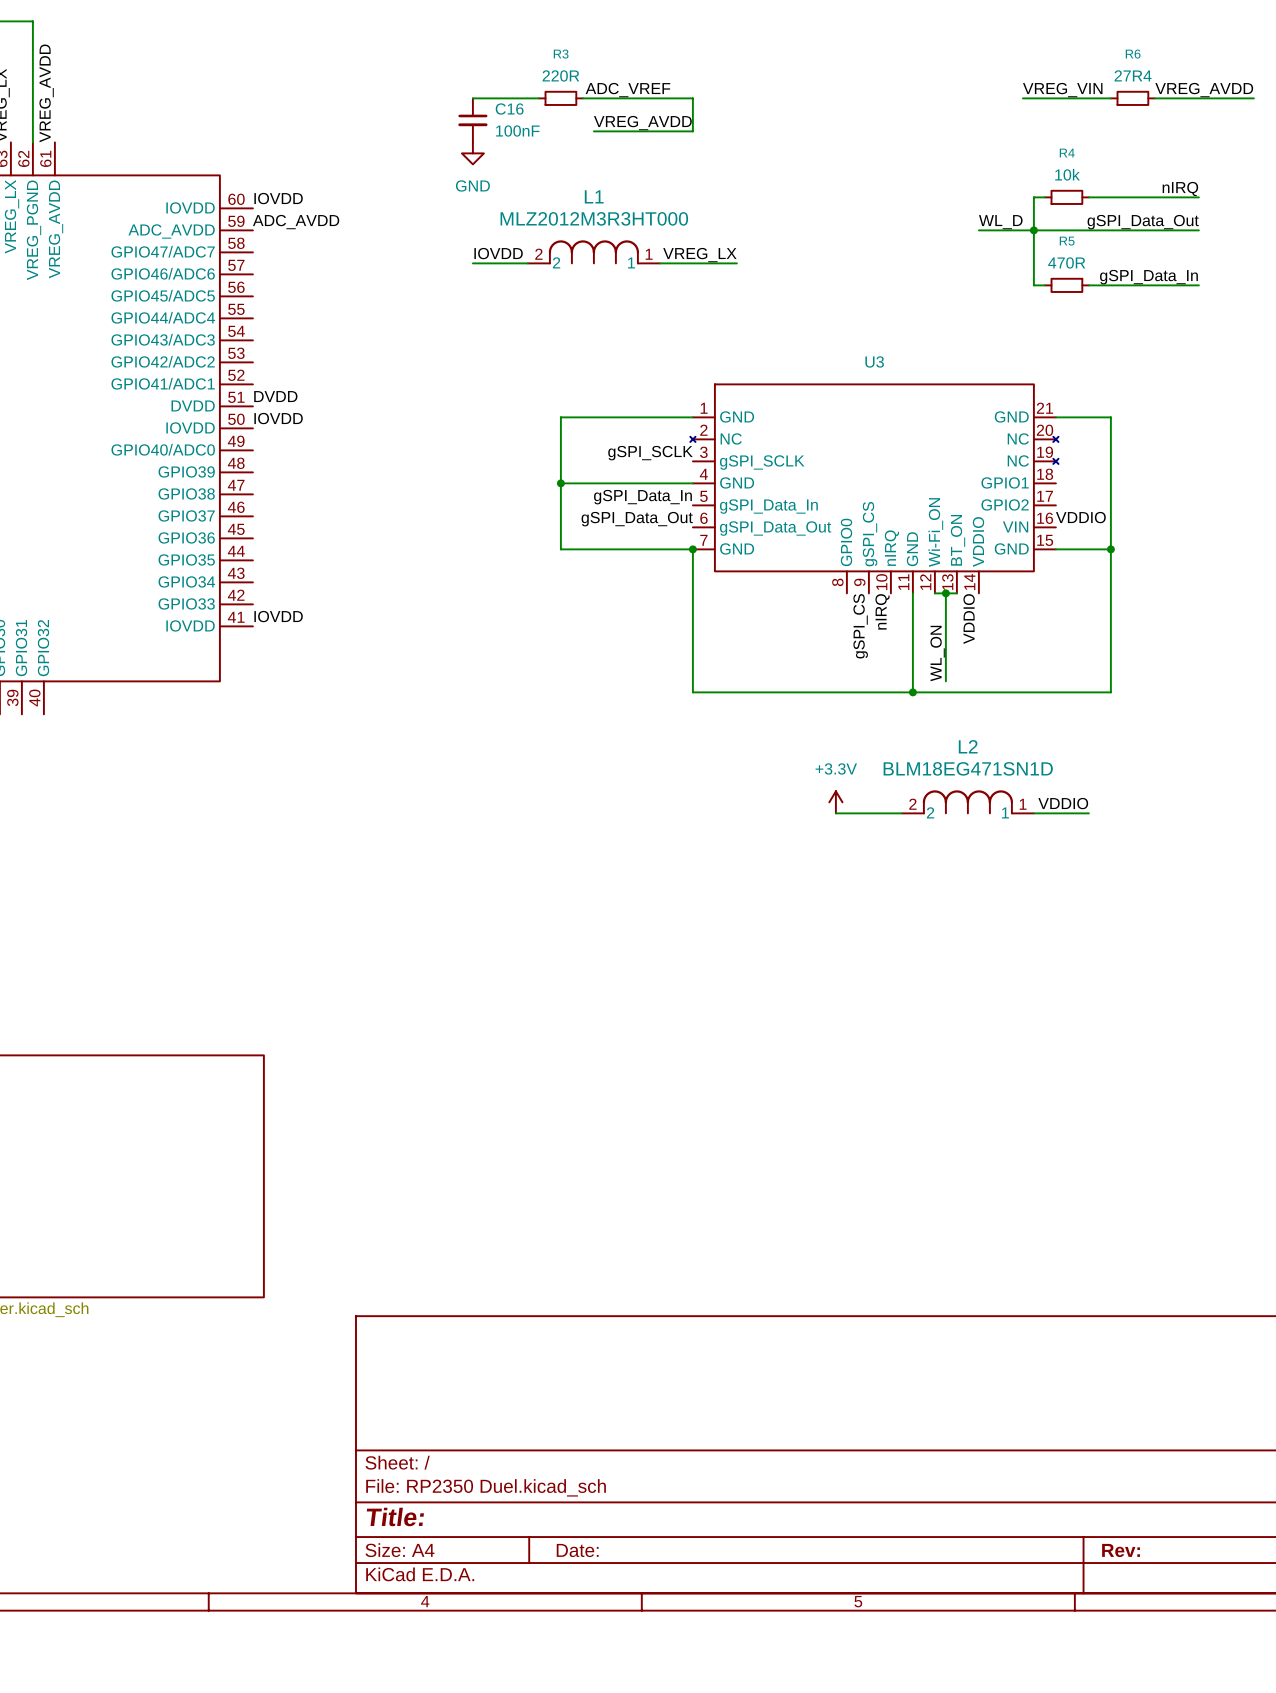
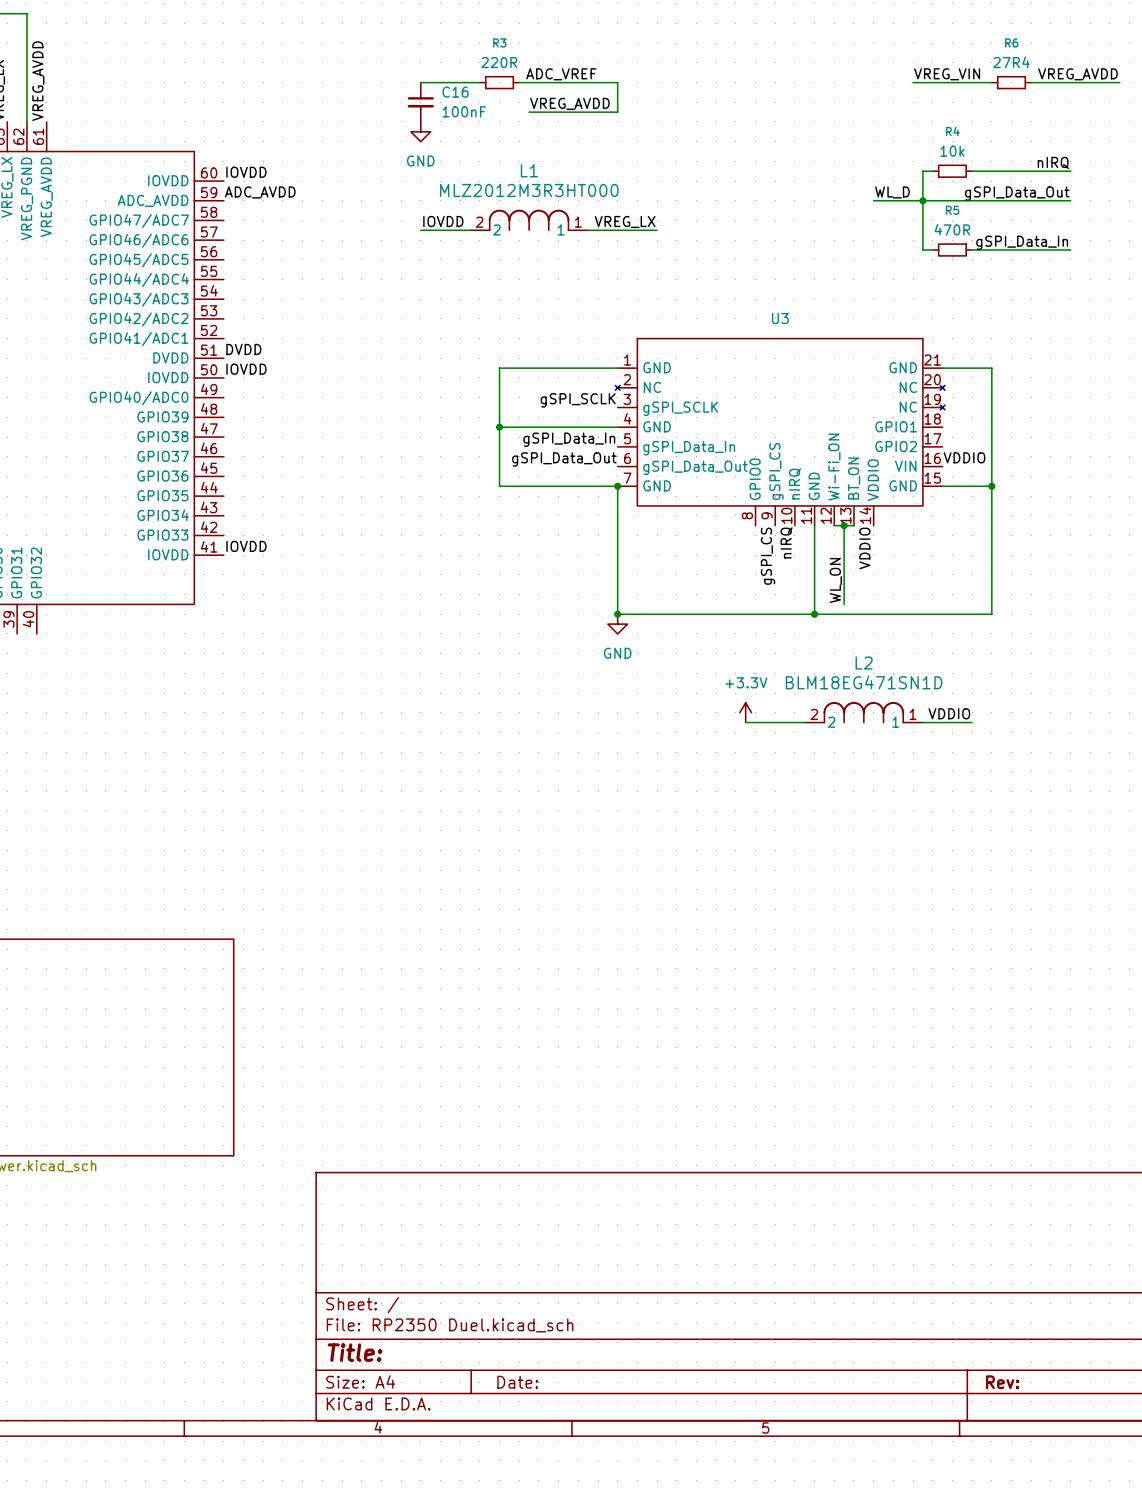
junction: none -> (617, 614)
power symbol: none -> GND (617, 624)

